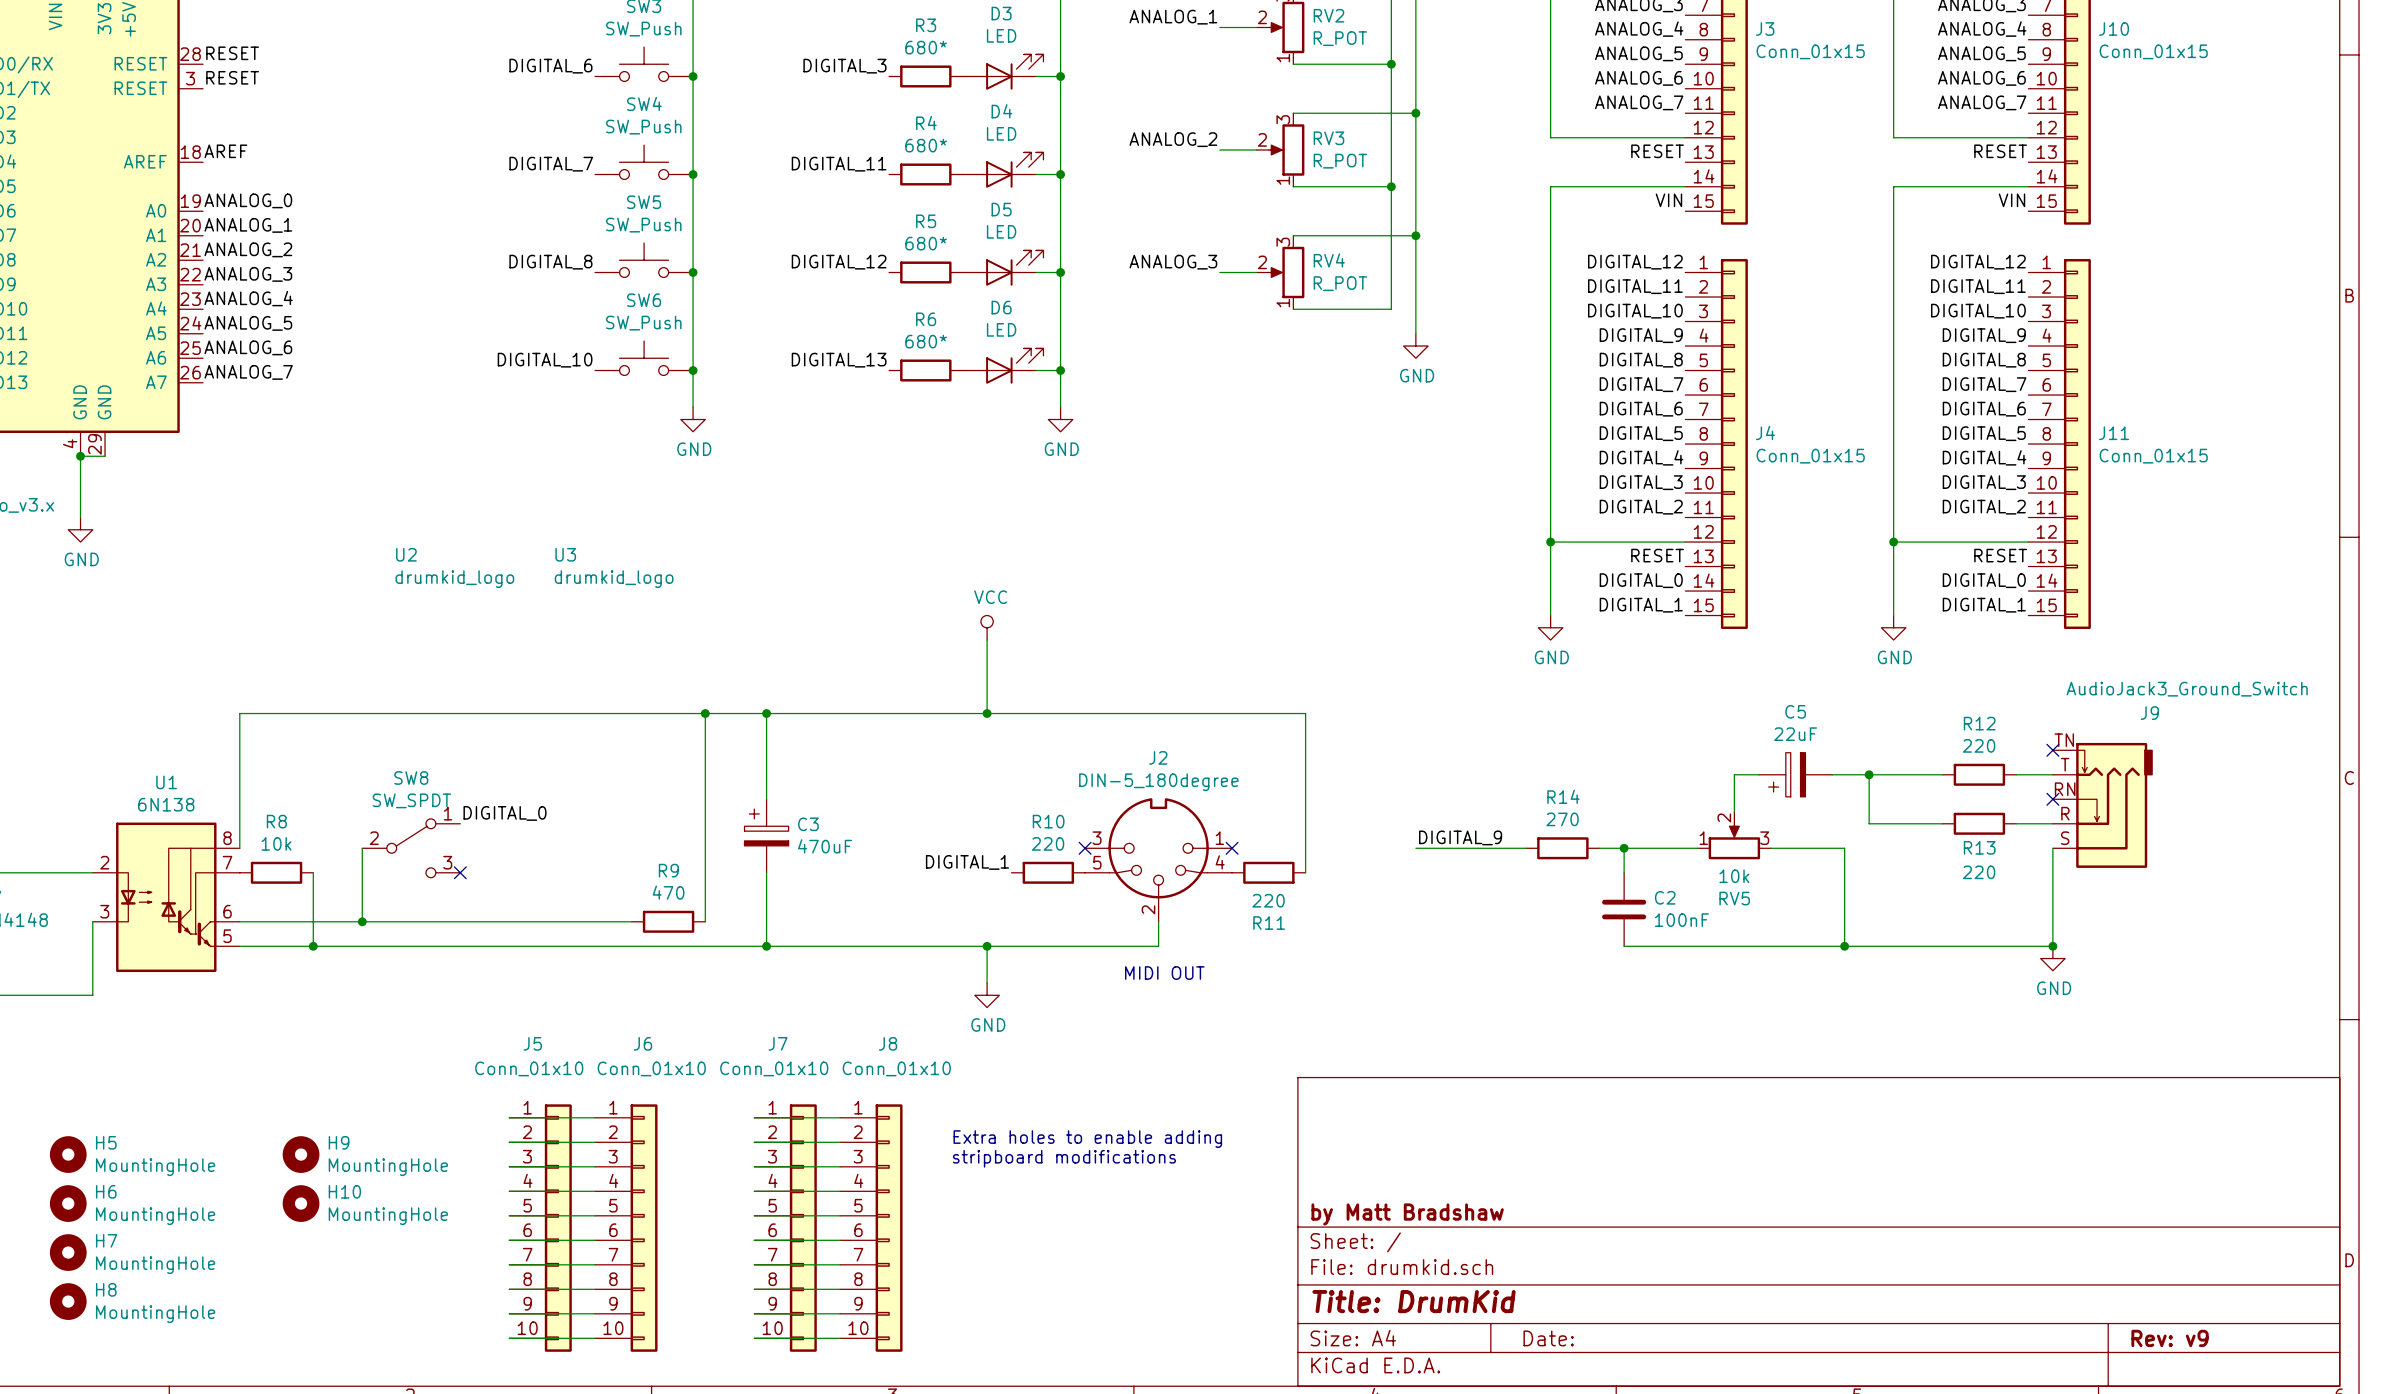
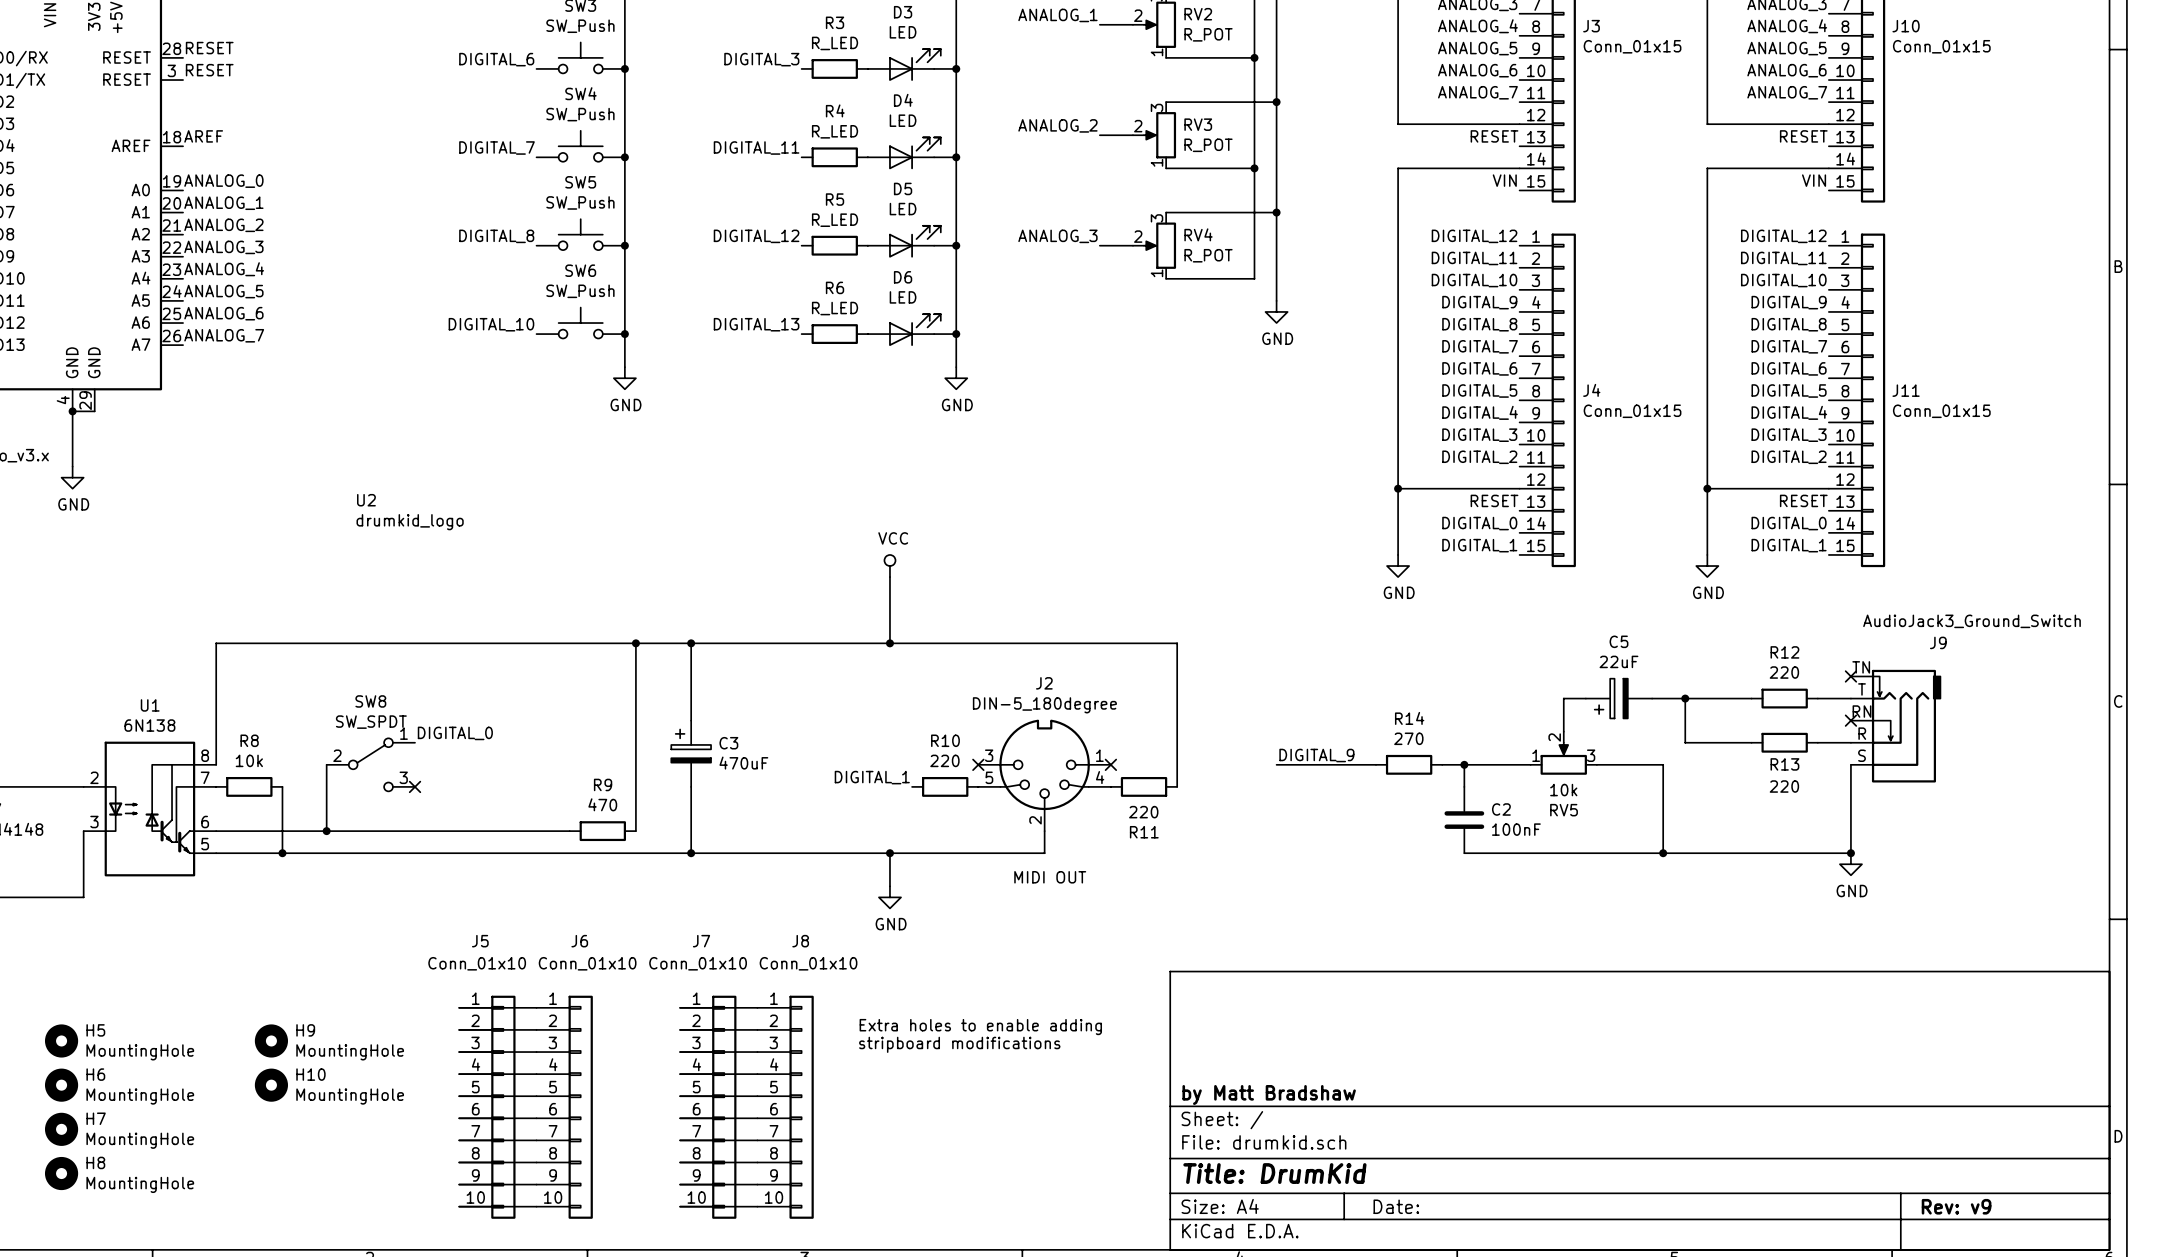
R3 value: 680* (926, 47) -> R_LED (835, 43)
R4 value: 680* (926, 145) -> R_LED (835, 131)
R5 value: 680* (926, 243) -> R_LED (835, 220)
R6 value: 680* (926, 341) -> R_LED (835, 308)
U3: drumkid_logo (614, 567) -> none

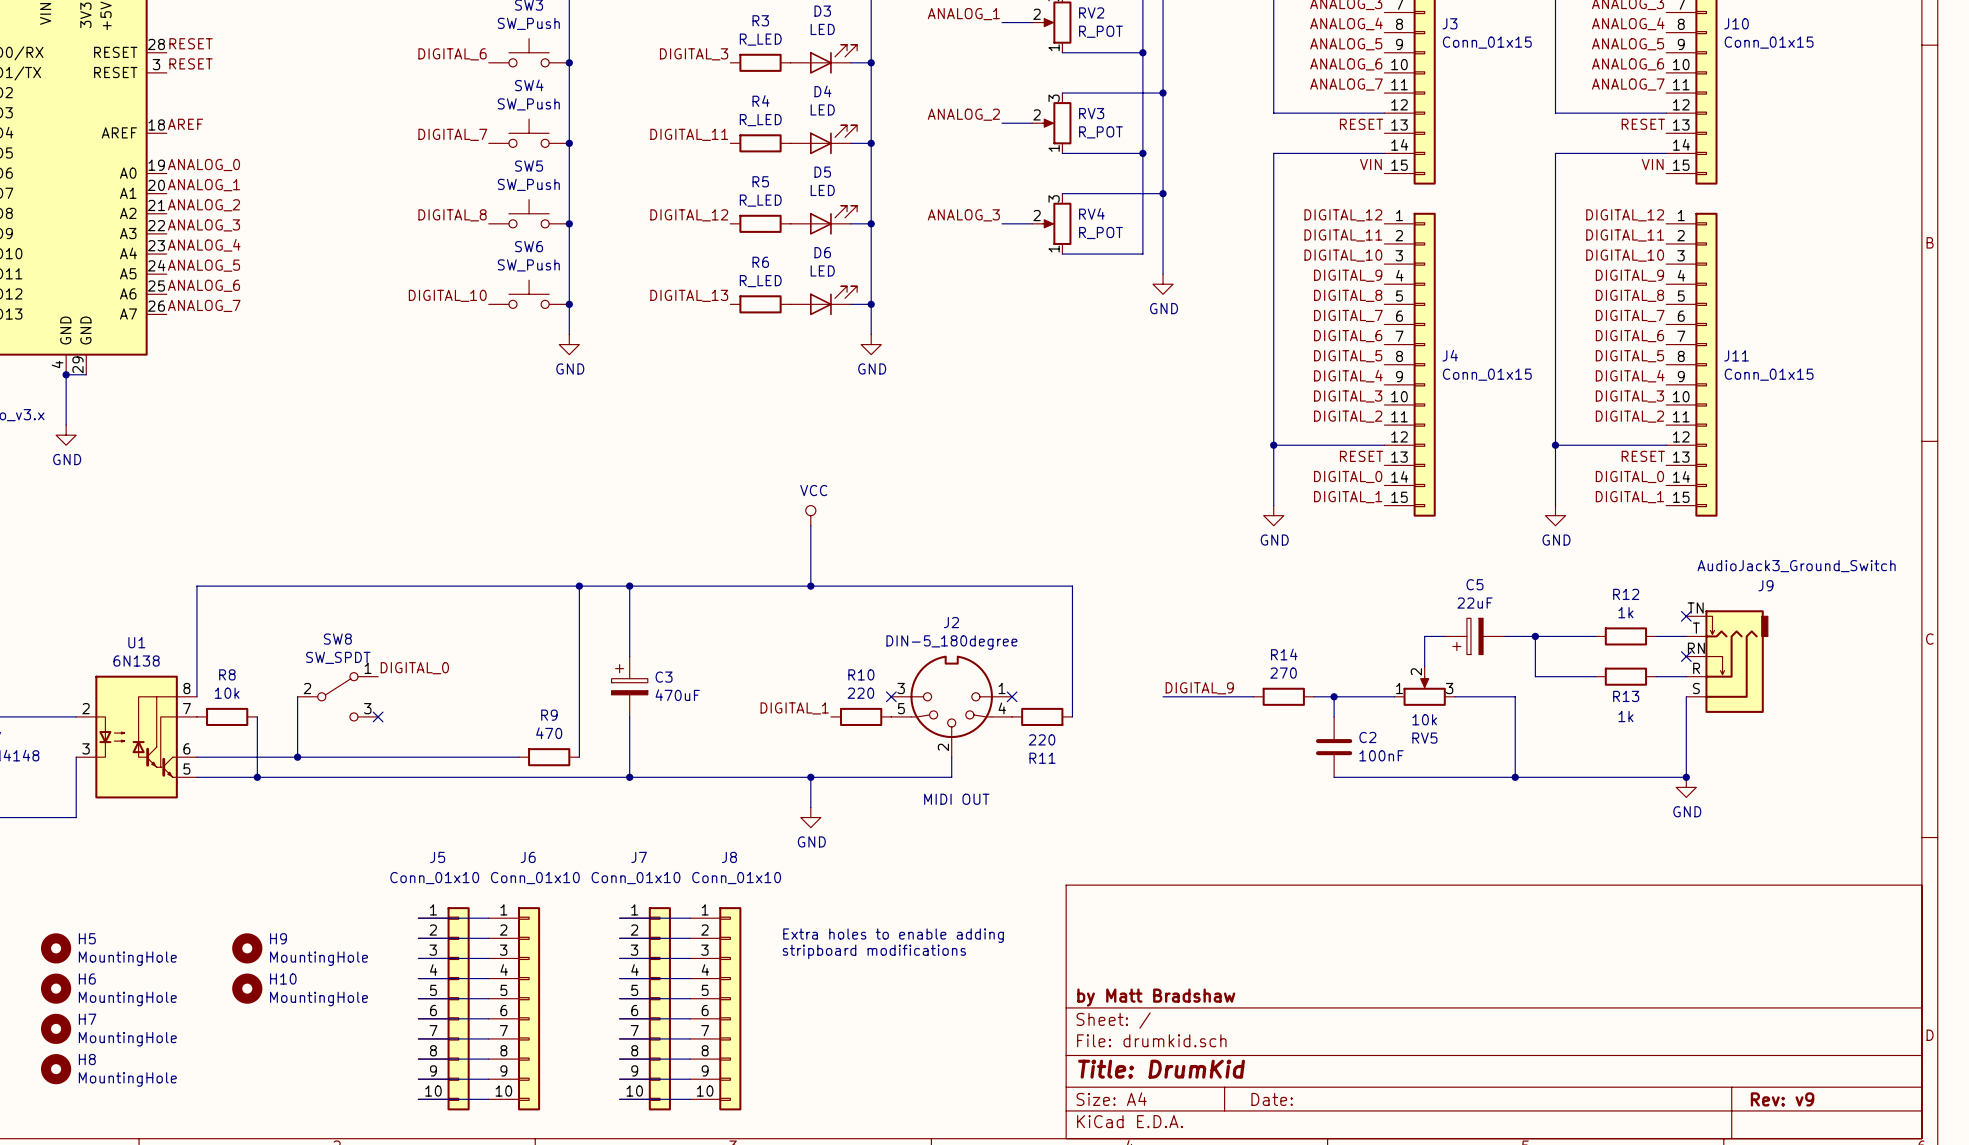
U2: drumkid_logo (410, 512) -> none
R12 value: 220 (1784, 672) -> 1k (1625, 612)
R13 value: 220 (1784, 786) -> 1k (1625, 716)

